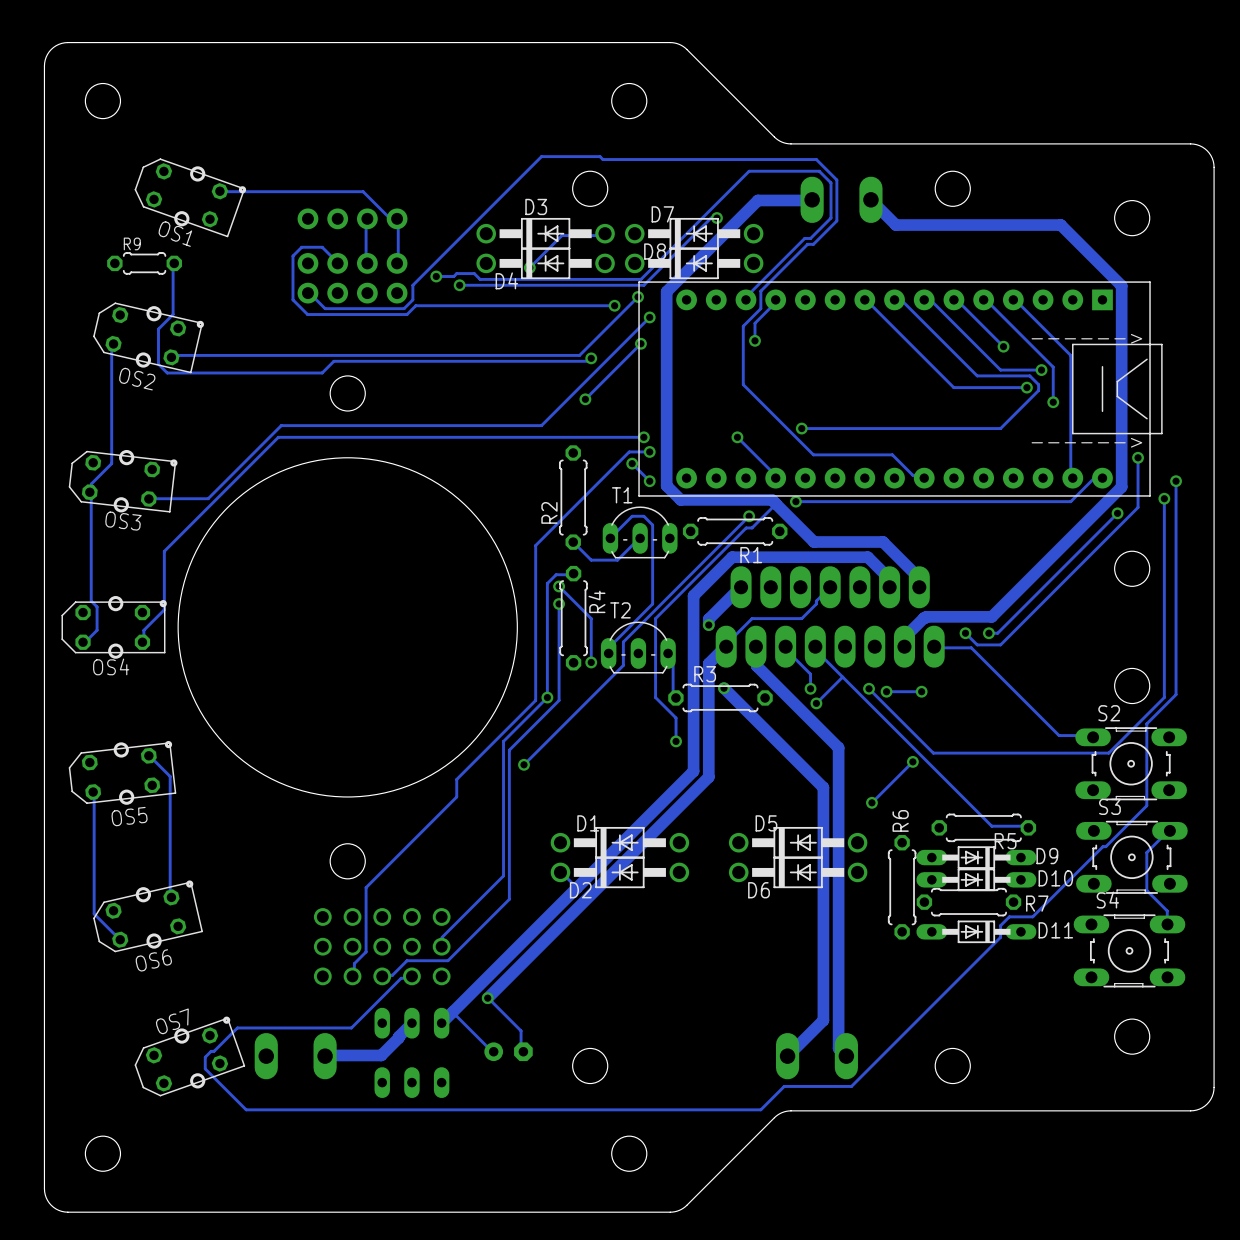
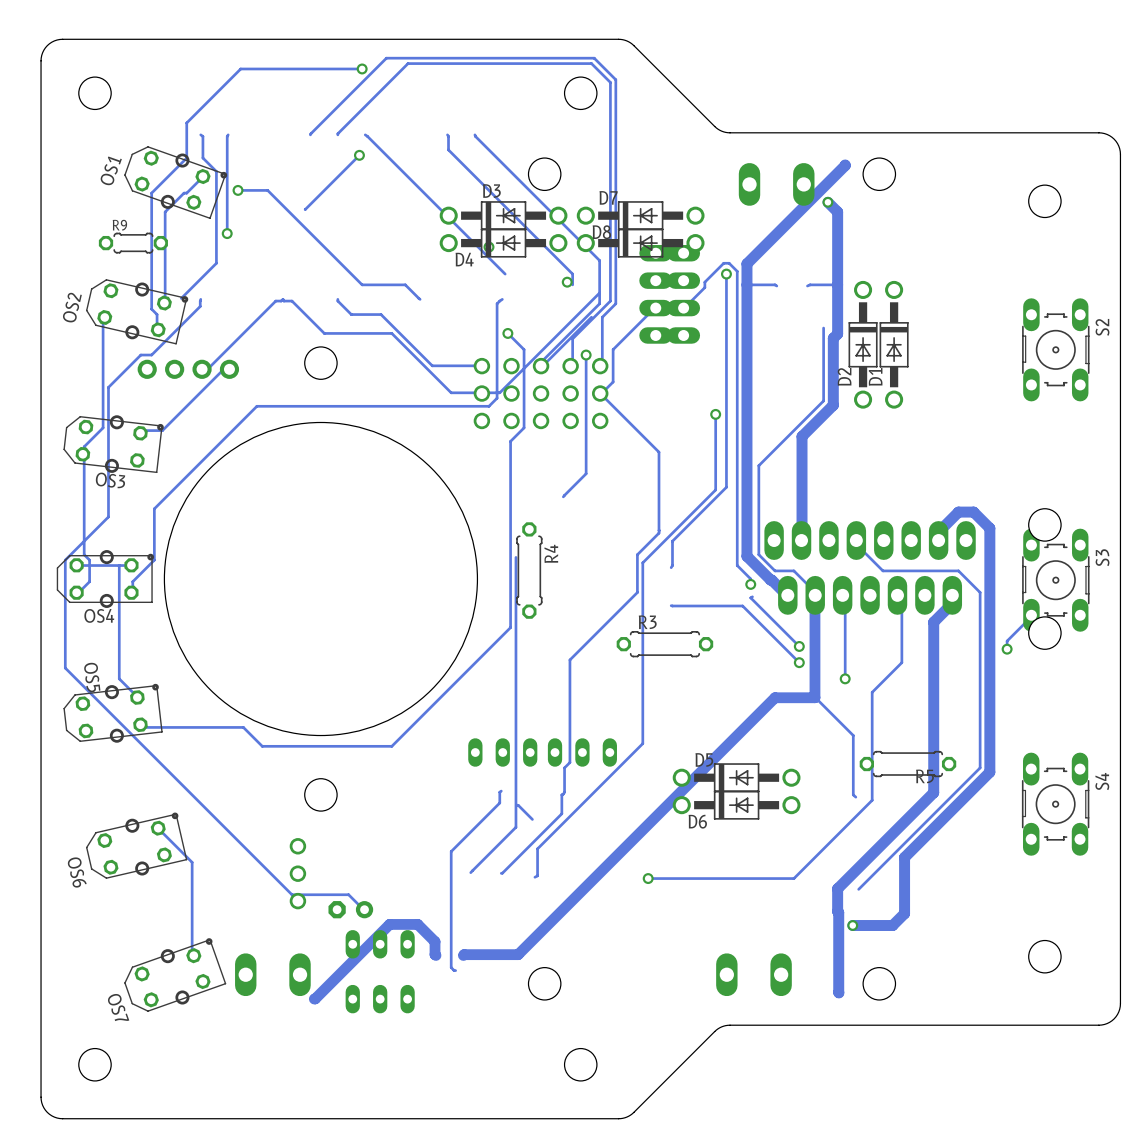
via: none -> (362, 68)
track: none -> (200, 134) (202, 136) (202, 158) (216, 171) (216, 263) (181, 298)
track: none -> (228, 134) (227, 233)
track: none -> (310, 134) (386, 58) (594, 58) (615, 79) (615, 303) (602, 317) (602, 365) (600, 366)
track: none -> (337, 134) (408, 63) (591, 63) (610, 82) (610, 301) (572, 338) (572, 365) (570, 366)
track: none -> (365, 134) (505, 274)
track: none -> (447, 134) (448, 149) (572, 274) (572, 284)
track: none -> (474, 134) (599, 260) (599, 303) (542, 360) (542, 365) (541, 366)
track: none -> (359, 155) (305, 209)
via: none -> (359, 155)
track: none -> (845, 164) (746, 263) (746, 556) (787, 595)
track: (219, 191) (363, 191) (389, 218) (395, 218) (398, 220) (397, 263) -> (202, 176) (165, 212) (164, 303)
track: (812, 199) (757, 200) (666, 291) (666, 485) (680, 499) (771, 499) (814, 542) (883, 542) (919, 578) (919, 587) -> none
track: (870, 199) (895, 225) (1060, 225) (1121, 285) (1121, 487) (991, 616) (926, 616) (905, 636) (904, 646) -> none
via: none -> (238, 190)
part: (352, 218) -> none
track: (367, 218) (367, 263) -> none
track: (716, 218) (711, 218) (643, 285) (459, 285) -> none
via: (716, 218) -> none
track: none -> (827, 202) (837, 212) (837, 333) (833, 338) (833, 405) (802, 436) (801, 540)
via: none -> (827, 202)
track: (605, 233) (602, 235) (562, 235) (529, 267) -> none
OS1 name rotation: 0° (175, 234) -> 90° counterclockwise (111, 170)
OS1 name position: OS1 (175, 234) -> OS1 (111, 170)
via: none -> (227, 233)
track: (174, 263) (173, 314) (158, 329) (158, 364) (167, 372) (322, 372) (333, 361) (351, 361) -> (202, 369) (208, 368) (275, 301) (283, 299) (291, 301) (324, 333)
track: (337, 263) (322, 247) (301, 247) (292, 256) (292, 299) (307, 314) (407, 314) (415, 305) (614, 305) -> none
part: (352, 263) -> none
track: (436, 276) (474, 273) (480, 279) (640, 279) (749, 171) (819, 171) (831, 182) (831, 218) (810, 238) (804, 238) (743, 299) (745, 299) -> none
via: (436, 276) -> none
via: (459, 285) -> none
track: (307, 293) (325, 308) (392, 308) -> (238, 190) (267, 190) (362, 284)
part: (352, 293) -> none
track: (638, 296) (579, 355) (173, 355) (171, 357) -> (362, 68) (240, 68) (186, 122) (186, 158) (151, 193) (151, 309) (157, 314) (158, 329)
via: (638, 296) -> none
track: none -> (726, 274) (726, 487) (672, 541) (671, 567)
via: none -> (726, 274)
track: (775, 299) (778, 299) (754, 323) (754, 340) -> none
track: (864, 299) (953, 387) (1026, 387) -> none
track: (894, 299) (901, 299) (977, 375) (1029, 375) (1038, 384) (1038, 390) (1000, 428) (801, 428) -> none
track: (924, 299) (930, 299) (1000, 370) (1041, 370) -> none
track: (953, 299) (956, 299) (1003, 346) -> none
track: (983, 299) (985, 299) (1053, 367) (1053, 402) -> none
track: (1013, 299) (1070, 355) (1070, 475) (1072, 478) -> none
track: (404, 308) (412, 299) (412, 285) (541, 156) (600, 156) (602, 159) (816, 159) (836, 180) (836, 220) (813, 244) (807, 244) (760, 291) (760, 308) (743, 326) (743, 384) (813, 454) (892, 454) (912, 475) (921, 475) (924, 478) -> (372, 284) (405, 284) (420, 299)
track: none -> (746, 284) (776, 286)
track: none -> (837, 284) (807, 286)
via: (649, 317) -> none
part: none -> (655, 294)
part: none -> (683, 294)
track: none -> (200, 299) (200, 306) (151, 355) (140, 355) (108, 387) (108, 516) (65, 560) (65, 668) (291, 894) (348, 894) (364, 909)
track: none -> (337, 299) (351, 314) (381, 314) (432, 365) (481, 366)
track: none -> (655, 308) (613, 349) (613, 382) (600, 393) (658, 452) (658, 533) (637, 554) (637, 592) (569, 659) (569, 762) (564, 767) (561, 813) (501, 873)
track: none -> (683, 308) (704, 287) (704, 282) (723, 263) (729, 263) (737, 271) (737, 565) (750, 579) (750, 584)
via: (754, 340) -> none
via: (640, 343) -> none
via: (1003, 346) -> none
track: none -> (823, 328) (823, 400) (758, 465) (758, 554) (775, 570) (793, 570) (815, 592) (814, 697)
track: (591, 358) (588, 361) (424, 361) -> (451, 392) (391, 333)
via: (591, 358) -> none
track: none -> (507, 333) (524, 349) (524, 427) (510, 441) (510, 627) (391, 746) (262, 746) (243, 727) (140, 727) (140, 724)
via: none -> (507, 333)
via: (1041, 370) -> none
OS2 name rotation: 0° (137, 379) -> 90° counterclockwise (72, 307)
OS2 name position: OS2 (137, 379) -> OS2 (72, 307)
via: none -> (586, 355)
via: (1026, 387) -> none
part: (900, 389) -> none
via: (585, 399) -> none
part: none -> (188, 369)
track: none -> (229, 369) (221, 371) (162, 430) (140, 430) (140, 433)
via: (1053, 402) -> none
track: (488, 425) (281, 425) (208, 498) (148, 498) -> none
part: none -> (481, 393)
part: none -> (511, 393)
part: none -> (541, 393)
part: none -> (570, 393)
part: none -> (600, 393)
via: (801, 428) -> none
track: (643, 437) (278, 437) (164, 551) (164, 609) -> (502, 299) (497, 303) (497, 398) (488, 406) (256, 406) (154, 508) (154, 560) (151, 562)
via: (643, 437) -> none
track: (737, 437) (775, 475) (775, 478) -> none
via: (737, 437) -> none
track: none -> (715, 414) (715, 489) (642, 562) (642, 743) (537, 848) (537, 875) (534, 877)
via: none -> (715, 414)
track: (649, 451) (629, 451) (535, 545) (535, 700) (456, 779) (456, 796) (366, 887) (366, 951) (354, 963) (354, 975) (352, 976) -> none
via: (649, 451) -> none
track: (1138, 457) (1138, 507) (1000, 644) (977, 644) (965, 633) -> none
via: (1138, 457) -> none
track: (632, 463) (649, 481) -> none
via: (632, 463) -> none
track: (1102, 478) (1094, 478) (1070, 501) (795, 501) -> none
via: (649, 481) -> none
track: (1176, 481) (1176, 694) (1146, 723) (1146, 805) (1032, 916) (1009, 916) (1000, 925) (1000, 937) (851, 1086) (784, 1086) (760, 1109) (246, 1109) (205, 1068) (205, 1057) (211, 1051) (214, 1051) (237, 1027) (351, 1027) (401, 978) (409, 978) (411, 976) -> none
via: (1176, 481) -> none
R2: (573, 497) -> none
track: (1164, 498) (1164, 697) (1108, 753) (933, 753) (869, 688) -> none
via: (1164, 498) -> none
via: (795, 501) -> none
track: (776, 503) (752, 527) (746, 527) (655, 618) (655, 697) (676, 718) (676, 741) -> none
track: (1117, 513) (997, 633) (988, 633) -> none
via: (1117, 513) -> none
track: (632, 516) (643, 516) (652, 525) (652, 603) (605, 650) (608, 653) -> (583, 476) (586, 473) (586, 355)
track: (749, 516) (623, 642) (623, 665) (523, 764) -> none
via: (749, 516) -> none
R1: (735, 531) -> none
T1 side: bottom (640, 532) -> top (582, 752)
track: (640, 538) (617, 560) (591, 560) (573, 542) -> none
track: (573, 573) (556, 574) (547, 583) (547, 697) (503, 741) (503, 875) (442, 937) (441, 946) -> none
track: none -> (856, 540) (858, 541) (858, 546) (882, 570) (958, 570) (980, 592) (980, 767) (858, 889)
track: none -> (938, 540) (939, 531) (958, 512) (973, 512) (989, 528) (989, 772) (904, 857) (904, 913) (892, 925) (852, 925)
track: (559, 586) (591, 618) (591, 662) -> none
via: (559, 586) -> none
track: (741, 587) (708, 619) (708, 625) -> none
track: (830, 587) (801, 618) (752, 618) (708, 663) (708, 777) (487, 998) (521, 1030) (521, 1051) (523, 1051) -> none
track: (889, 587) (888, 578) (867, 557) (732, 557) (693, 595) (693, 771) (441, 1023) -> none
via: (559, 603) -> none
track: none -> (119, 565) (119, 678) (137, 697)
track: none -> (131, 565) (76, 565)
part rotation: 0° (830, 616) -> 180° (870, 567)
via: (708, 625) -> none
via: none -> (750, 584)
via: (965, 633) -> none
via: (988, 633) -> none
track: none -> (842, 595) (845, 597) (845, 678)
track: none -> (897, 595) (901, 600) (901, 662) (872, 692) (872, 800) (793, 878) (648, 878)
track: none -> (952, 595) (952, 603) (933, 622) (933, 792) (837, 888) (838, 992)
track: (755, 646) (756, 665) (838, 747) (838, 1048) (846, 1056) -> none
track: (785, 646) (784, 647) (810, 674) (810, 688) -> none
track: (934, 646) (971, 647) (1059, 735) (1091, 735) (1093, 737) -> none
T2 side: bottom (638, 647) -> top (502, 752)
track: (668, 653) (673, 656) (673, 697) (675, 697) -> none
track: none -> (671, 605) (742, 605) (799, 662)
via: (591, 662) -> none
track: none -> (1031, 615) (1007, 641) (1007, 649)
track: (842, 677) (816, 703) -> none
track: (723, 688) (823, 787) (823, 1020) (787, 1056) -> none
via: (723, 688) -> none
via: (810, 688) -> none
via: (869, 688) -> none
via: (886, 691) -> none
track: (921, 691) (886, 691) -> none
via: (921, 691) -> none
via: (547, 697) -> none
track: (559, 700) (509, 750) (509, 899) (447, 960) (407, 960) (392, 975) (382, 976) -> (515, 646) (515, 827) (470, 872)
track: (866, 700) (991, 826) (1026, 826) (1028, 827) -> none
via: none -> (799, 646)
via: (816, 703) -> none
via: none -> (1007, 649)
via: none -> (799, 662)
via: none -> (845, 678)
via: (676, 741) -> none
track: (148, 755) (170, 776) (171, 897) -> (193, 955) (192, 954) (192, 862) (158, 828)
track: none -> (814, 697) (853, 735) (853, 794) (855, 797)
track: none -> (814, 697) (775, 697) (518, 954) (463, 955)
track: (912, 761) (871, 802) -> none
via: (912, 761) -> none
S2 rotation: 0° (1131, 763) -> 90° clockwise (1055, 349)
S2 position: (1131, 763) -> (1055, 349)
via: (523, 764) -> none
track: (93, 792) (94, 913) (120, 939) -> none
via: (871, 802) -> none
OS5 name rotation: 0° (129, 816) -> 90° clockwise (92, 677)
OS5 name position: OS5 (129, 816) -> OS5 (92, 677)
D1 name position: D1 (588, 823) -> D1 (875, 376)
track: (1169, 830) (1146, 852) (1146, 890) (1167, 911) (1167, 924) -> none
D1 rotation: 0° (619, 842) -> 90° clockwise (894, 344)
D1 position: (619, 842) -> (894, 344)
D9: (976, 857) -> none
S3 rotation: 0° (1131, 857) -> 90° clockwise (1055, 580)
S3 position: (1131, 857) -> (1055, 580)
D2 rotation: 0° (619, 872) -> 90° clockwise (863, 344)
D2 position: (619, 872) -> (863, 344)
D10: (976, 879) -> none
R6: (902, 887) -> none
D2 name position: D2 (580, 890) -> D2 (844, 376)
R7: (968, 902) -> none
D11: (976, 931) -> none
part: (352, 946) -> none
part: (382, 946) -> none
part: (411, 946) -> none
part: (441, 946) -> none
S4 rotation: 0° (1129, 950) -> 90° clockwise (1055, 804)
S4 position: (1129, 950) -> (1055, 804)
via: none -> (648, 878)
OS6 name rotation: 0° (153, 960) -> 90° clockwise (77, 872)
OS6 name position: OS6 (153, 960) -> OS6 (77, 872)
via: (487, 998) -> none
via: none -> (852, 925)
track: (452, 1012) (488, 1048) -> (501, 791) (499, 802) (451, 851) (451, 967)
OS7 name rotation: 0° (172, 1021) -> 90° clockwise (118, 1007)
OS7 name position: OS7 (172, 1021) -> OS7 (118, 1007)
track: (411, 1023) (381, 1055) (325, 1056) -> none
track: none -> (435, 955) (435, 941) (417, 924) (389, 924) (314, 999)
part rotation: 0° (508, 1051) -> 180° (350, 909)
part position: (508, 1051) -> (350, 909)

